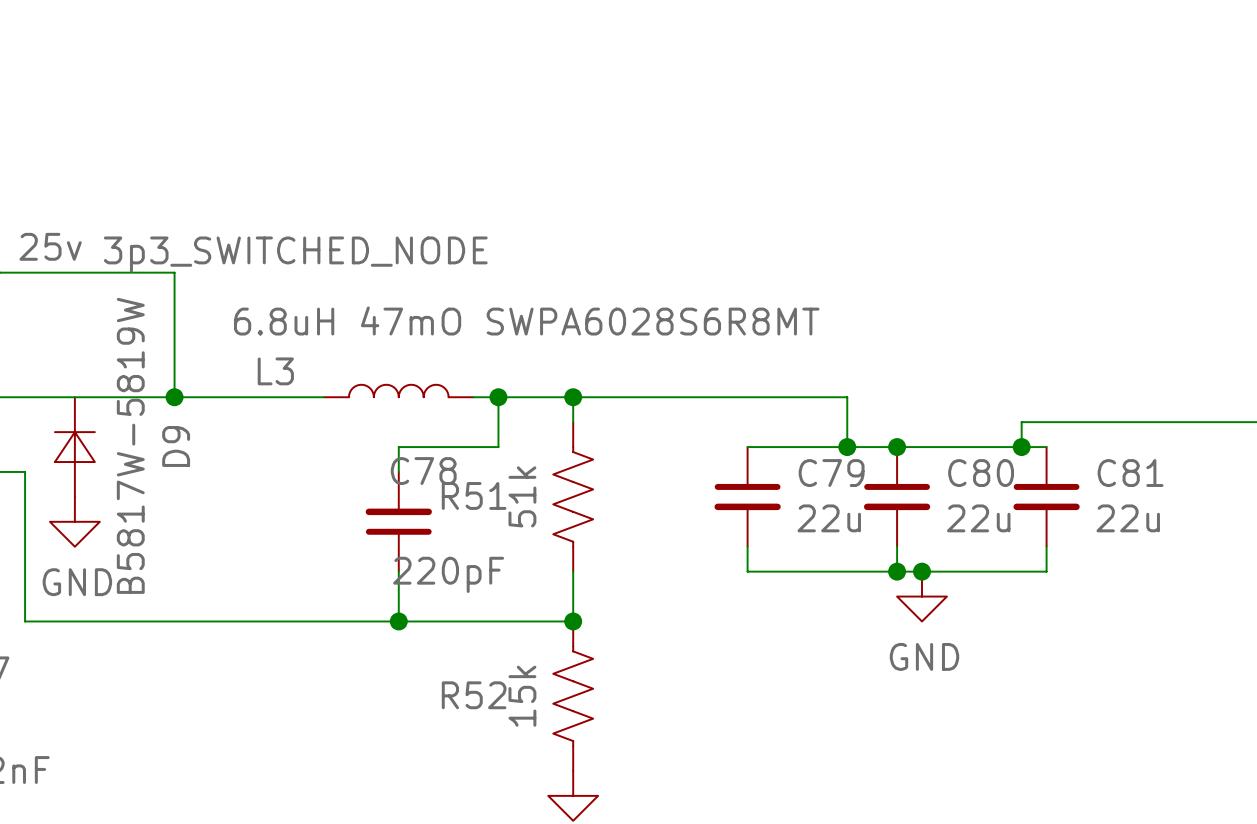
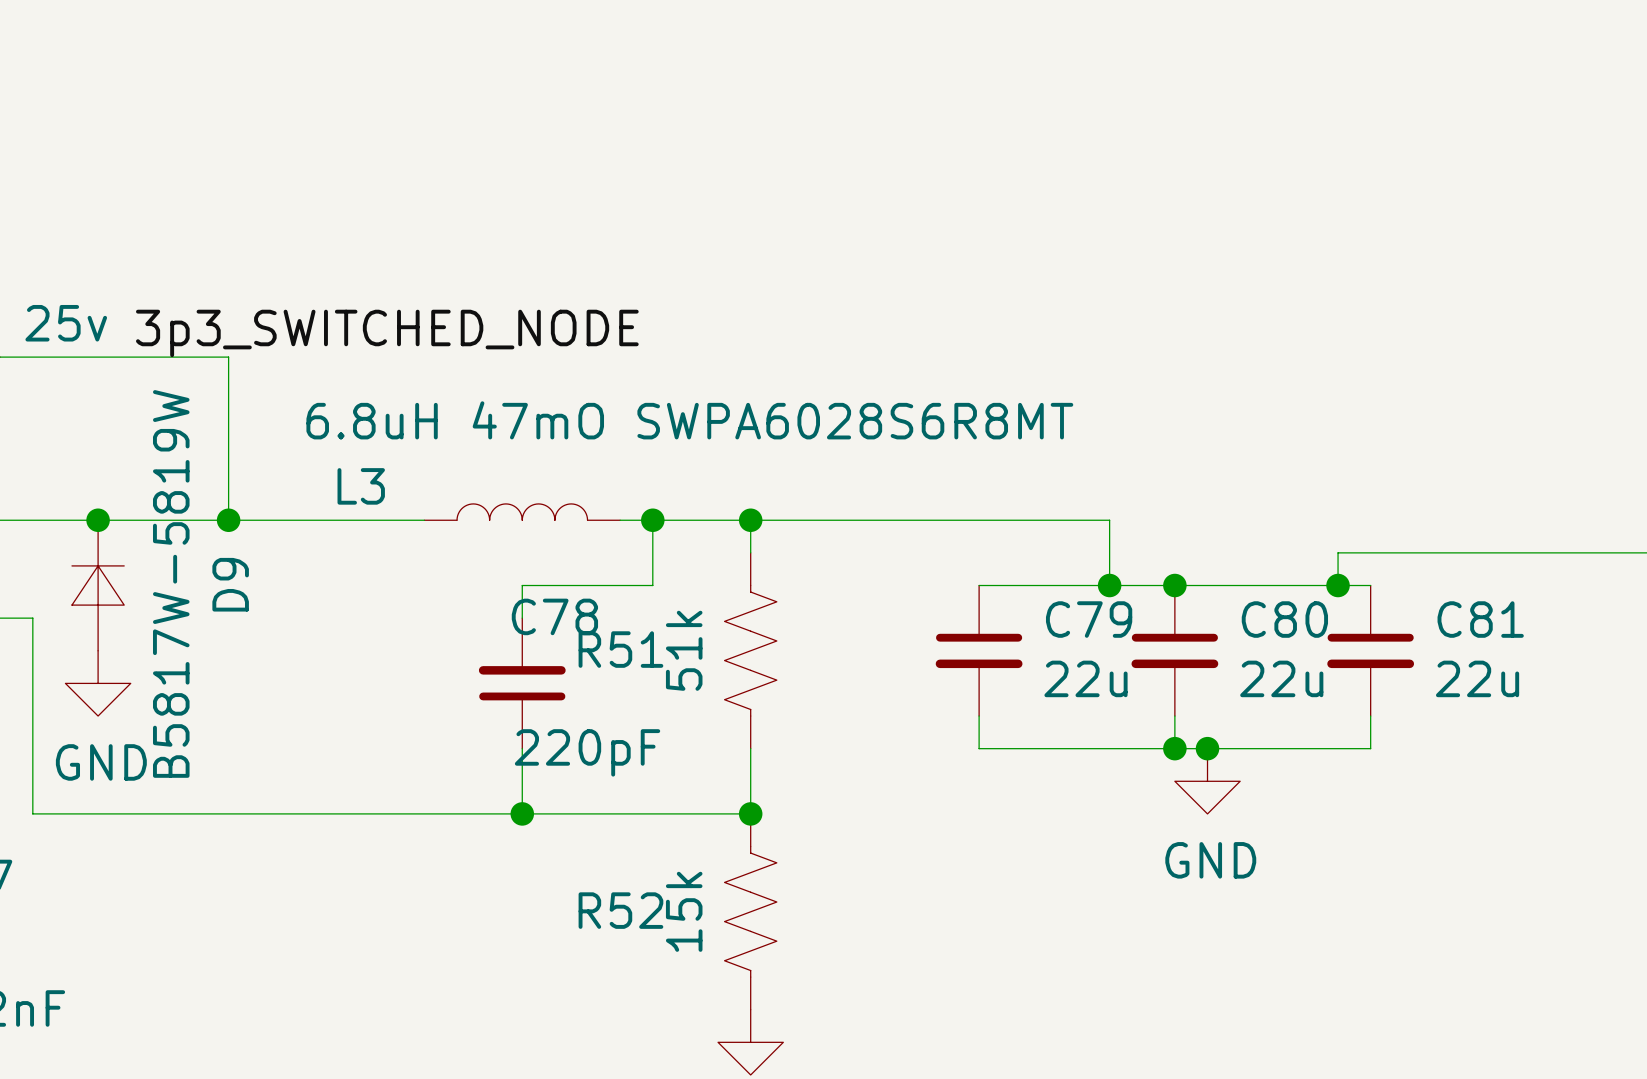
junction: none -> (98, 520)

